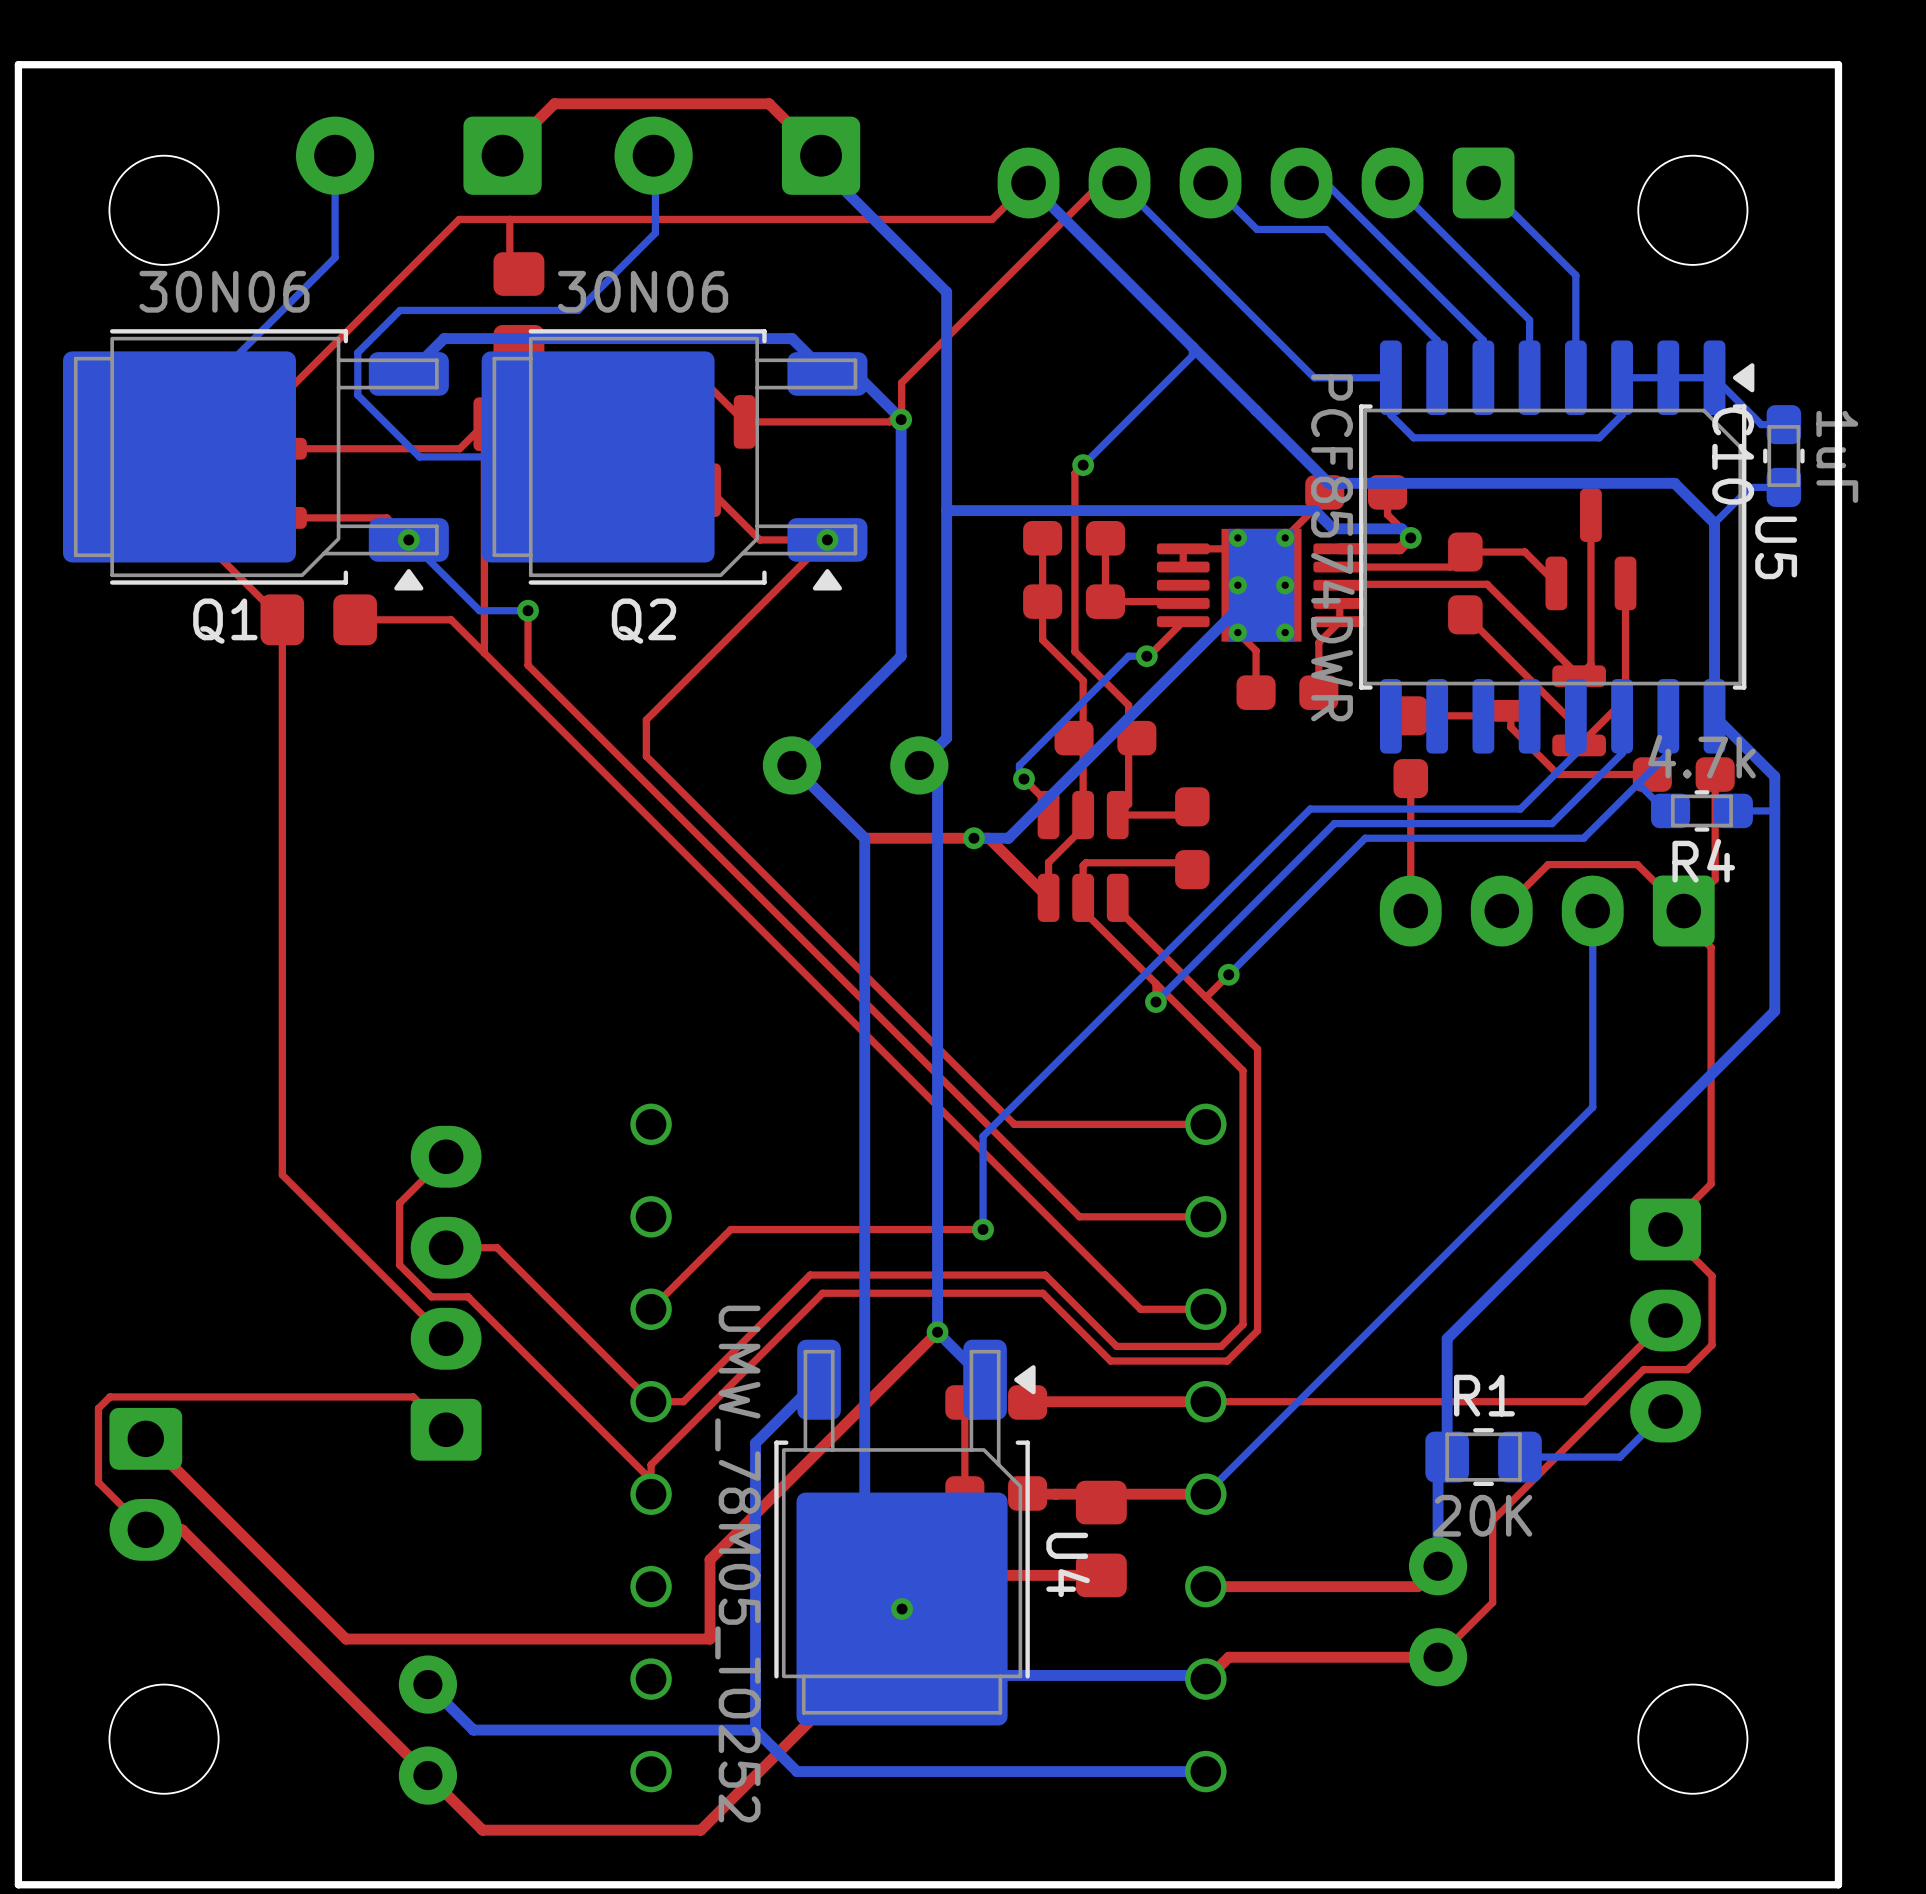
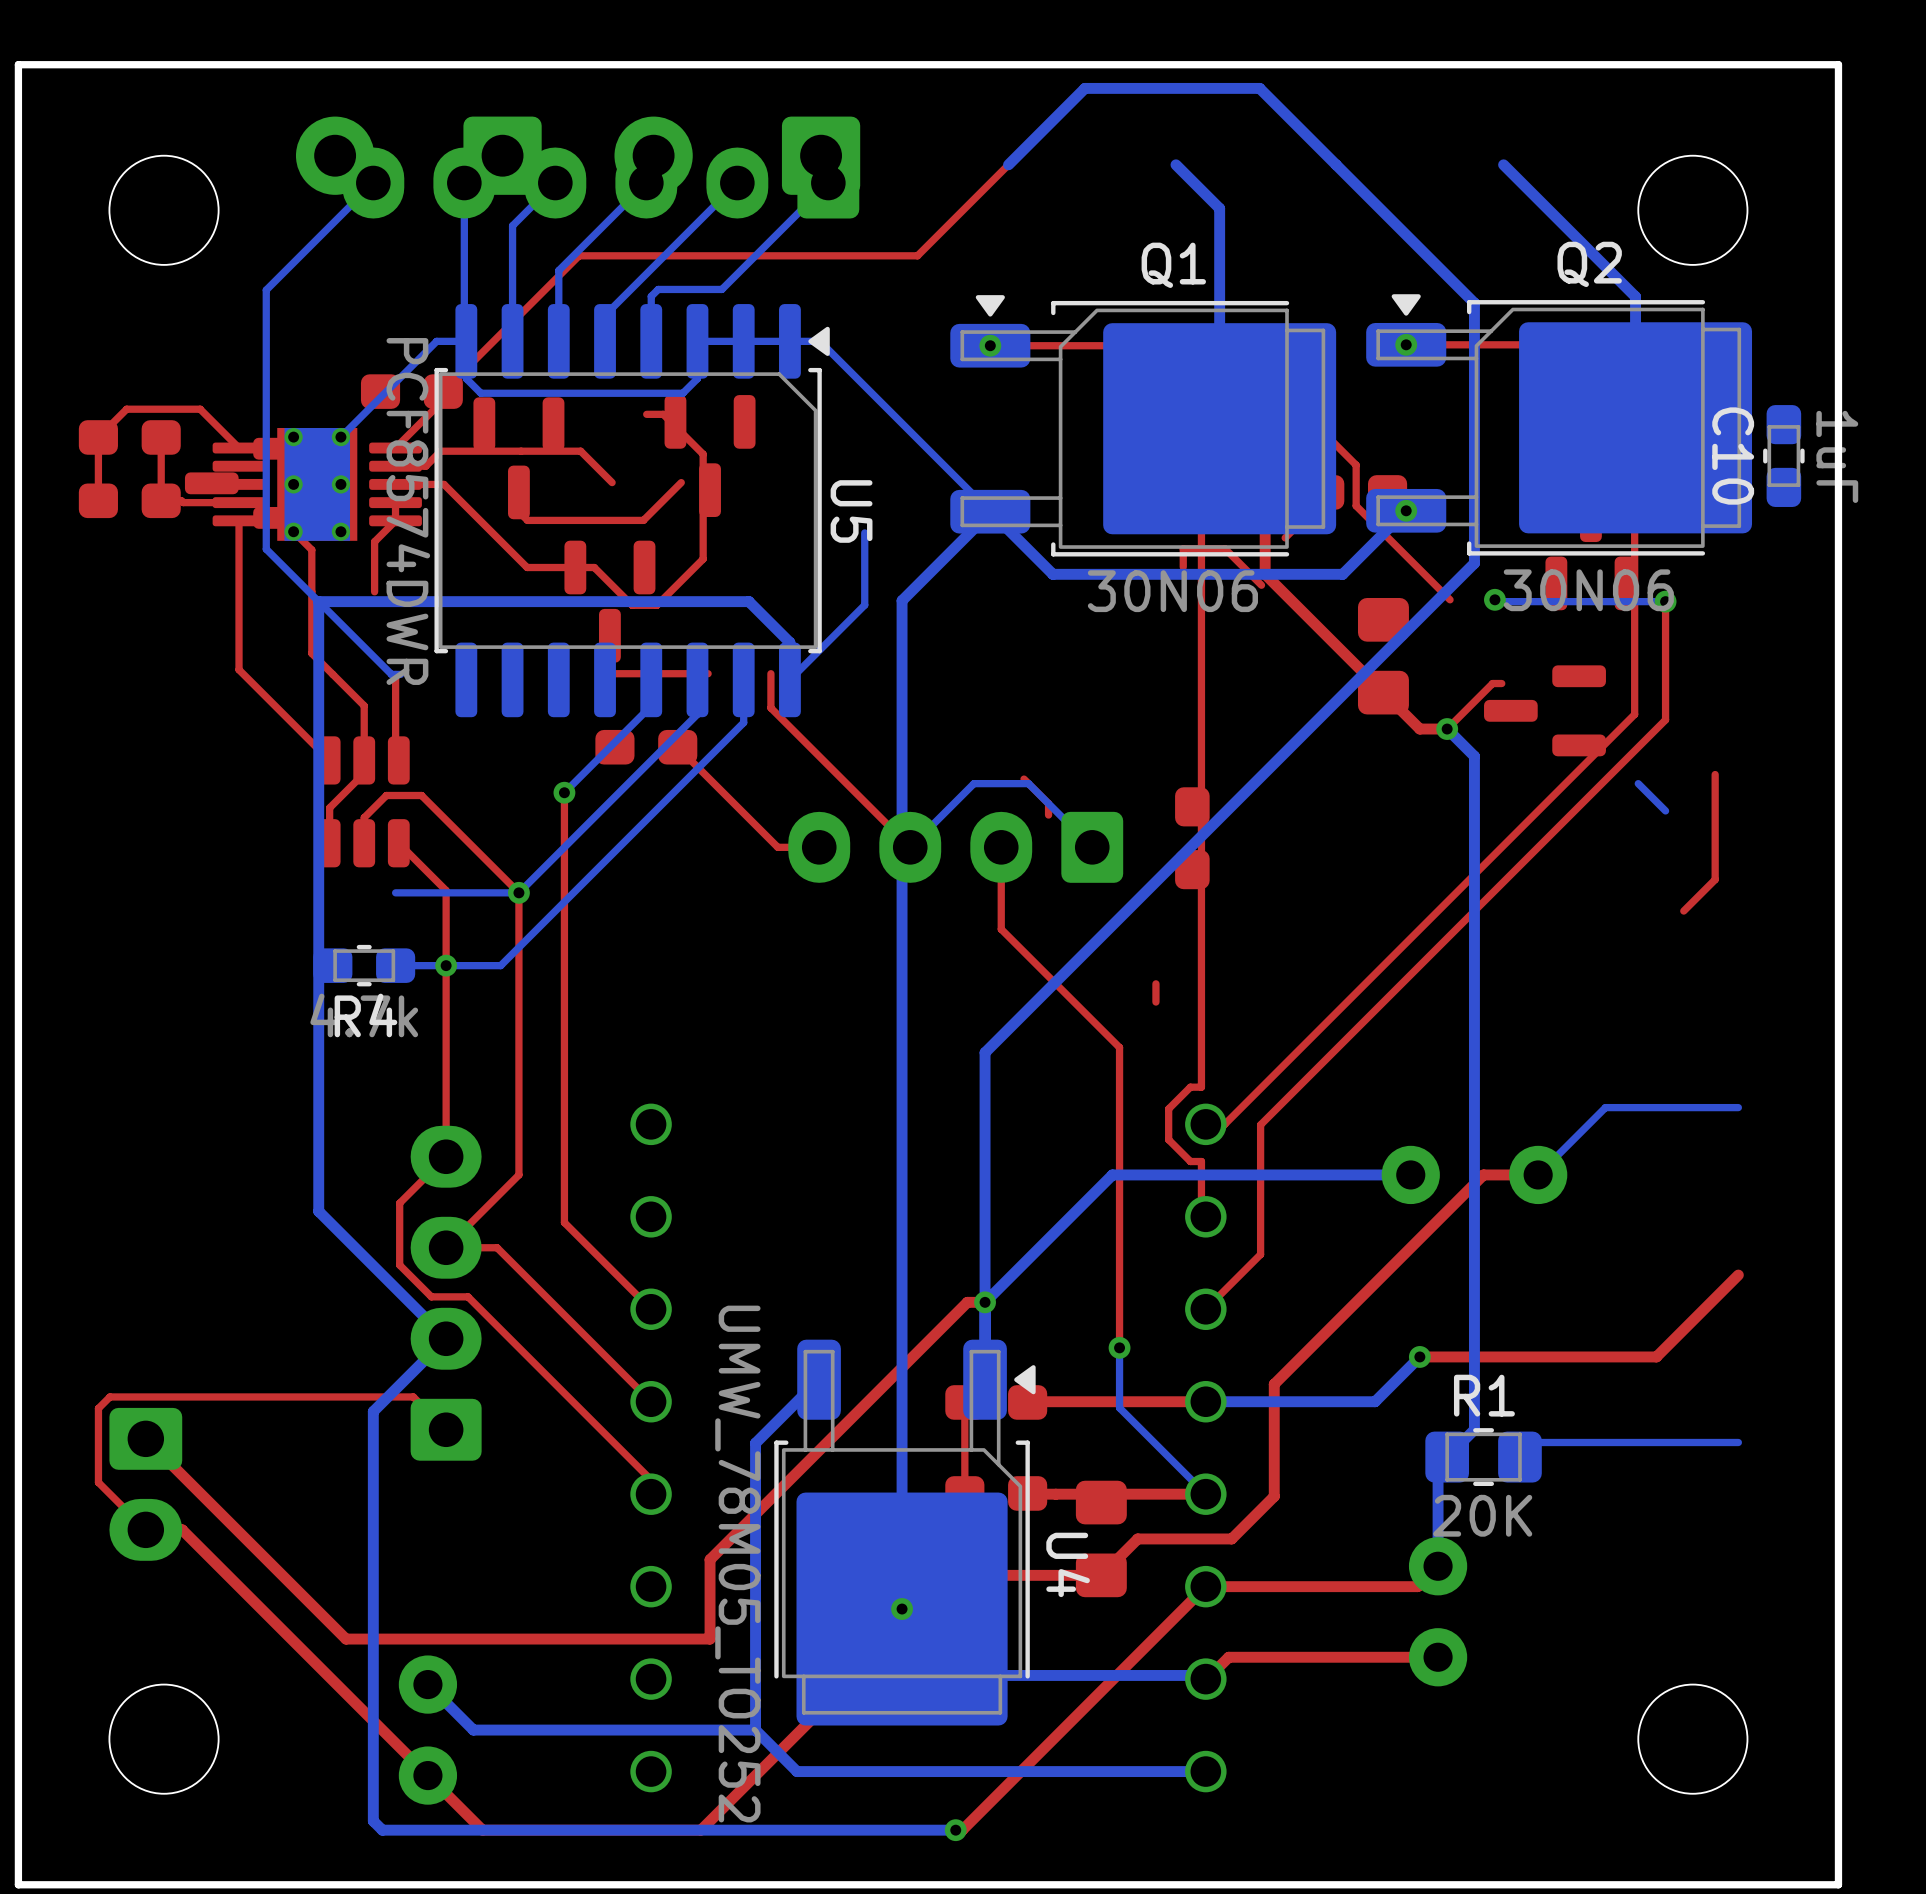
bottom track: (335, 155) (335, 257) (179, 413) (179, 456) -> none
bottom track: (653, 155) (655, 157) (655, 233) (578, 310) (400, 310) (357, 352) (357, 395) (419, 456) (598, 456) -> none
top track: (821, 155) (769, 103) (554, 103) (502, 155) -> none
bottom track: (821, 155) (821, 166) (946, 292) (946, 738) (919, 765) (937, 783) (937, 1332) (985, 1379) -> (1008, 164) (1084, 88) (1259, 88) (1474, 303) (1474, 563) (985, 1052) (985, 1379)
top track: none -> (1008, 164) (917, 255) (579, 255) (443, 391) (443, 400) (395, 448)
bottom track: none -> (1175, 164) (1219, 208) (1219, 428)
bottom track: none -> (1503, 164) (1635, 296) (1635, 427)
bottom track: none -> (373, 183) (266, 290) (266, 549) (391, 674) (400, 674)
bottom track: none -> (464, 183) (464, 339) (466, 341)
bottom track: none -> (555, 183) (512, 225) (512, 341)
bottom track: none -> (646, 183) (558, 270) (558, 341)
bottom track: none -> (737, 183) (605, 315) (605, 341)
bottom track: none -> (828, 183) (721, 289) (658, 289) (651, 296) (651, 341)
top track: (1028, 183) (992, 219) (459, 219) (211, 466) (211, 549) (282, 619) (282, 1174) (446, 1338) -> none
bottom track: (1028, 183) (1328, 483) (1674, 483) (1714, 523) -> none
top track: (1119, 183) (1101, 183) (901, 382) (901, 419) (892, 419) (889, 421) (744, 421) (706, 384) (593, 384) (553, 424) -> none
bottom track: (1119, 183) (1314, 377) (1390, 377) (1390, 415) (1413, 437) (1599, 437) (1622, 415) (1622, 377) (1714, 377) (1761, 424) (1783, 424) -> none
bottom track: (1210, 183) (1257, 229) (1326, 229) (1437, 340) (1437, 377) -> none
part position: (1256, 183) -> (600, 183)
bottom track: (1301, 183) (1325, 183) (1483, 340) (1483, 377) -> none
bottom track: (1392, 183) (1529, 320) (1529, 377) -> none
bottom track: (1483, 183) (1575, 275) (1575, 377) -> none
top track: (509, 219) (509, 264) -> none
part: (518, 310) -> none
bottom track: none -> (466, 341) (436, 341) (340, 437)
bottom track: none -> (466, 341) (466, 378) (480, 393) (682, 393) (697, 378) (697, 341) (819, 341) (1052, 574) (1342, 574) (1406, 510)
via: none -> (1406, 344)
via: none -> (990, 345)
bottom track: (1192, 346) (1192, 355) (1083, 465) -> none
bottom track: (408, 373) (444, 338) (792, 338) (827, 373) (856, 373) (899, 417) -> none
top track: none -> (1265, 376) (1265, 574) (1419, 729) (1447, 729) (1492, 683) (1501, 683)
part: none -> (411, 391)
top track: none -> (646, 414) (663, 414) (703, 454) (703, 559) (656, 605) (632, 605) (594, 567) (527, 567) (444, 484) (395, 484)
bottom track: (901, 419) (901, 656) (791, 765) (864, 838) (864, 1571) (902, 1609) -> (990, 512) (902, 600) (902, 1609)
via: (901, 419) -> none
top track: none -> (1292, 423) (1314, 423) (1356, 465) (1356, 505) (1450, 599)
part: none -> (129, 437)
top track: none -> (161, 437) (161, 500) (239, 502)
top track: none -> (239, 448) (200, 409) (126, 409) (98, 437) (98, 500)
top track: (280, 448) (459, 448) (484, 424) (484, 653) -> none
Q1 rotation: 0° (255, 459) -> 180° (1143, 425)
Q1 position: (255, 459) -> (1143, 425)
Q2 rotation: 0° (674, 459) -> 180° (1559, 424)
Q2 position: (674, 459) -> (1559, 424)
top track: (1083, 465) (1074, 473) (1074, 651) (1128, 705) (1128, 804) (1117, 815) (1187, 815) -> none
via: (1083, 465) -> none
top track: none -> (395, 466) (425, 466) (440, 451) (580, 451) (612, 482)
top track: none -> (681, 482) (643, 520) (527, 520) (521, 513)
part: none -> (317, 484)
bottom track: (1783, 487) (1750, 487) (1714, 523) -> none
top track: (710, 490) (759, 539) (827, 539) -> none
top track: (1387, 492) (1387, 514) (1410, 537) (1399, 548) (1339, 548) -> none
part: none -> (129, 500)
top track: none -> (395, 502) (395, 520) (374, 541) (374, 591)
bottom track: (946, 510) (1314, 510) (1333, 528) (1401, 528) (1410, 537) -> none
top track: (1590, 515) (1590, 664) (1579, 676) (1487, 584) (1339, 585) -> none
top track: (280, 517) (386, 517) (408, 539) -> none
top track: none -> (239, 520) (239, 669) (329, 760)
bottom track: (1714, 523) (1714, 716) (1774, 776) (1774, 1011) (1447, 1338) (1447, 1457) -> (1447, 729) (1474, 756) (1474, 1429) (1447, 1457)
top track: none -> (293, 531) (311, 549) (311, 653) (364, 705) (364, 773) (329, 807) (329, 843)
bottom track: none -> (864, 532) (864, 605) (789, 679) (789, 642) (748, 601) (318, 601) (318, 1211) (446, 1338) (373, 1411) (373, 1821) (382, 1830) (955, 1830)
via position: (1410, 537) -> (1406, 510)
top track: (1042, 538) (1042, 640) (1083, 680) (1083, 827) (1048, 862) (1048, 897) (988, 838) (864, 838) (791, 765) -> none
part: (1074, 538) -> none
top track: (1105, 538) (1105, 601) (1181, 601) (1183, 603) -> none
bottom track: (408, 539) (479, 610) (528, 610) -> none
via: (408, 539) -> none
top track: (826, 539) (646, 719) (646, 756) (1014, 1124) (1205, 1124) -> (1406, 344) (1531, 344) (1574, 387) (1596, 387) (1634, 426) (1634, 714) (1224, 1124) (1205, 1124)
via: (827, 539) -> none
U5 position: (1556, 547) -> (632, 510)
top track: (1339, 567) (1450, 567) (1465, 552) (1524, 552) (1556, 583) -> none
part: (1465, 583) -> none
top track: (1625, 583) (1625, 699) (1579, 745) (1579, 728) (1465, 614) -> none
bottom track: (1261, 585) (1008, 838) (973, 838) -> none
part: (1261, 585) -> none
bottom track: none -> (1494, 599) (1496, 601) (1665, 601)
via: none -> (1494, 599)
part: none -> (609, 601)
part: (1074, 601) -> none
via: none -> (1665, 601)
top track: (1339, 603) (1339, 621) (1318, 642) (1318, 692) -> none
top track: (528, 610) (528, 665) (1079, 1216) (1205, 1216) -> (990, 345) (1131, 345) (1230, 444) (1201, 473) (1201, 1087) (1190, 1087) (1168, 1108) (1168, 1139) (1190, 1161) (1201, 1161) (1201, 1212) (1205, 1216)
via: (528, 610) -> none
part: (318, 619) -> none
top track: (355, 619) (451, 619) (1140, 1309) (1205, 1309) -> (1665, 601) (1665, 719) (1260, 1124) (1260, 1254) (1205, 1309)
top track: (1183, 621) (1146, 656) -> none
top track: (1237, 632) (1256, 650) (1256, 692) -> none
bottom track: (1146, 656) (1128, 656) (1019, 765) (1019, 774) (1024, 779) -> none
via: (1146, 656) -> none
part: none -> (1383, 656)
top track: none -> (708, 673) (613, 673)
top track: none -> (770, 673) (770, 708) (910, 847)
top track: none -> (395, 674) (395, 757) (398, 760)
bottom track: none -> (651, 679) (646, 684) (646, 710) (564, 792)
bottom track: none -> (697, 679) (697, 714) (518, 892) (395, 892)
bottom track: none -> (743, 679) (743, 722) (500, 965) (404, 965) (395, 956)
part: (1287, 692) -> none
top track: (1410, 715) (1505, 715) (1510, 710) (1510, 727) (1558, 774) (1652, 774) -> none
bottom track: (1575, 716) (1575, 753) (1520, 809) (1310, 809) (983, 1136) (983, 1229) -> none
bottom track: (1622, 716) (1622, 753) (1552, 823) (1334, 823) (1155, 1002) -> none
bottom track: (1668, 716) (1668, 753) (1583, 838) (1365, 838) (1228, 974) -> none
via: none -> (1447, 729)
part: (1105, 738) -> none
part: none -> (646, 747)
top track: none -> (677, 747) (777, 847) (819, 847)
part: (1410, 747) -> none
R4 value position: 4.7k (1701, 756) -> 4.7k (364, 1015)
part position: (855, 765) -> (1474, 1174)
part: (1683, 774) -> none
top track: (1410, 778) (1410, 911) -> none
via: (1024, 779) -> none
via: none -> (564, 792)
R4 position: (1701, 810) -> (364, 965)
bottom track: (1774, 810) (1738, 810) -> none
via: (973, 838) -> none
top track: none -> (364, 843) (364, 817) (386, 795) (421, 795) (518, 892) (518, 1174) (446, 1247)
top track: none -> (398, 843) (446, 890) (446, 1156)
top track: none -> (1001, 847) (1001, 929) (1119, 1047) (1119, 1347)
bottom track: none -> (1092, 847) (1028, 783) (973, 783) (910, 847)
part position: (1083, 856) -> (364, 801)
top track: (1180, 862) (1085, 862) (1083, 865) (1083, 910) (1242, 1070) (1242, 1324) (1221, 1346) (1116, 1346) (1045, 1275) (810, 1275) (683, 1401) (651, 1401) -> none
via: none -> (518, 892)
top track: (1117, 897) (1117, 909) (1257, 1049) (1257, 1330) (1227, 1361) (1110, 1361) (1042, 1293) (822, 1293) (651, 1464) (651, 1479) -> none
top track: (1501, 911) (1548, 864) (1637, 864) (1683, 911) (1683, 920) (1711, 947) (1711, 1184) (1665, 1229) (1712, 1276) (1712, 1345) (1687, 1369) (1643, 1369) (1492, 1520) (1492, 1602) (1438, 1657) -> none
part position: (1547, 911) -> (955, 847)
bottom track: (1592, 911) (1592, 1107) (1205, 1494) -> (1119, 1347) (1119, 1407) (1205, 1494)
via: none -> (446, 965)
top track: (1228, 974) (1206, 997) -> none
via: (1228, 974) -> none
via: (1155, 1002) -> none
bottom track: none -> (1738, 1107) (1605, 1107) (1538, 1174)
bottom track: none -> (1410, 1174) (1112, 1174) (985, 1302)
top track: none -> (1538, 1174) (1483, 1174) (1274, 1384) (1274, 1496) (1231, 1538) (1137, 1538) (1101, 1575)
top track: (983, 1229) (730, 1229) (651, 1309) -> (564, 792) (564, 1222) (651, 1309)
via: (983, 1229) -> none
top track: none -> (1738, 1275) (1656, 1356) (1419, 1356)
top track: none -> (985, 1302) (967, 1302) (937, 1332)
via: none -> (985, 1302)
top track: (1665, 1320) (1584, 1401) (1205, 1401) -> none
part: (1665, 1320) -> none
via: (937, 1332) -> none
via: none -> (1119, 1347)
bottom track: none -> (1419, 1356) (1375, 1401) (1205, 1401)
via: none -> (1419, 1356)
bottom track: (1665, 1411) (1620, 1457) (1519, 1457) -> (1738, 1442) (1534, 1442) (1519, 1457)
top track: none -> (1205, 1586) (962, 1830) (955, 1830)
via: none -> (955, 1830)

